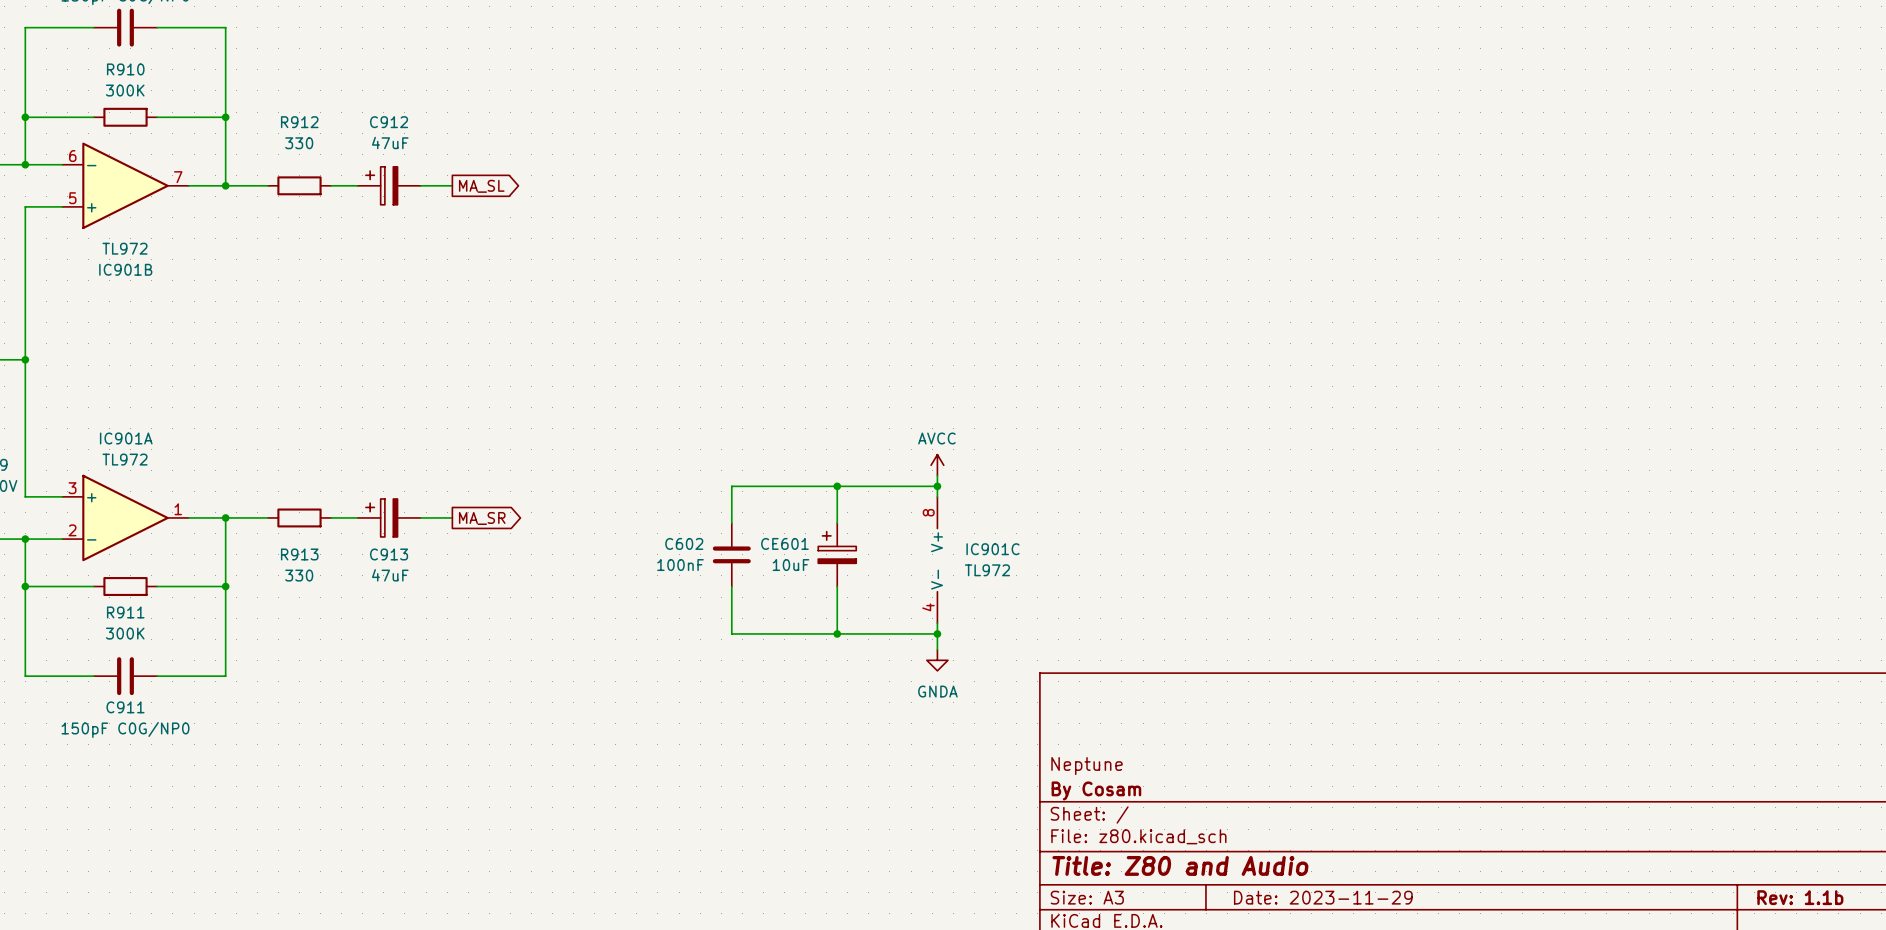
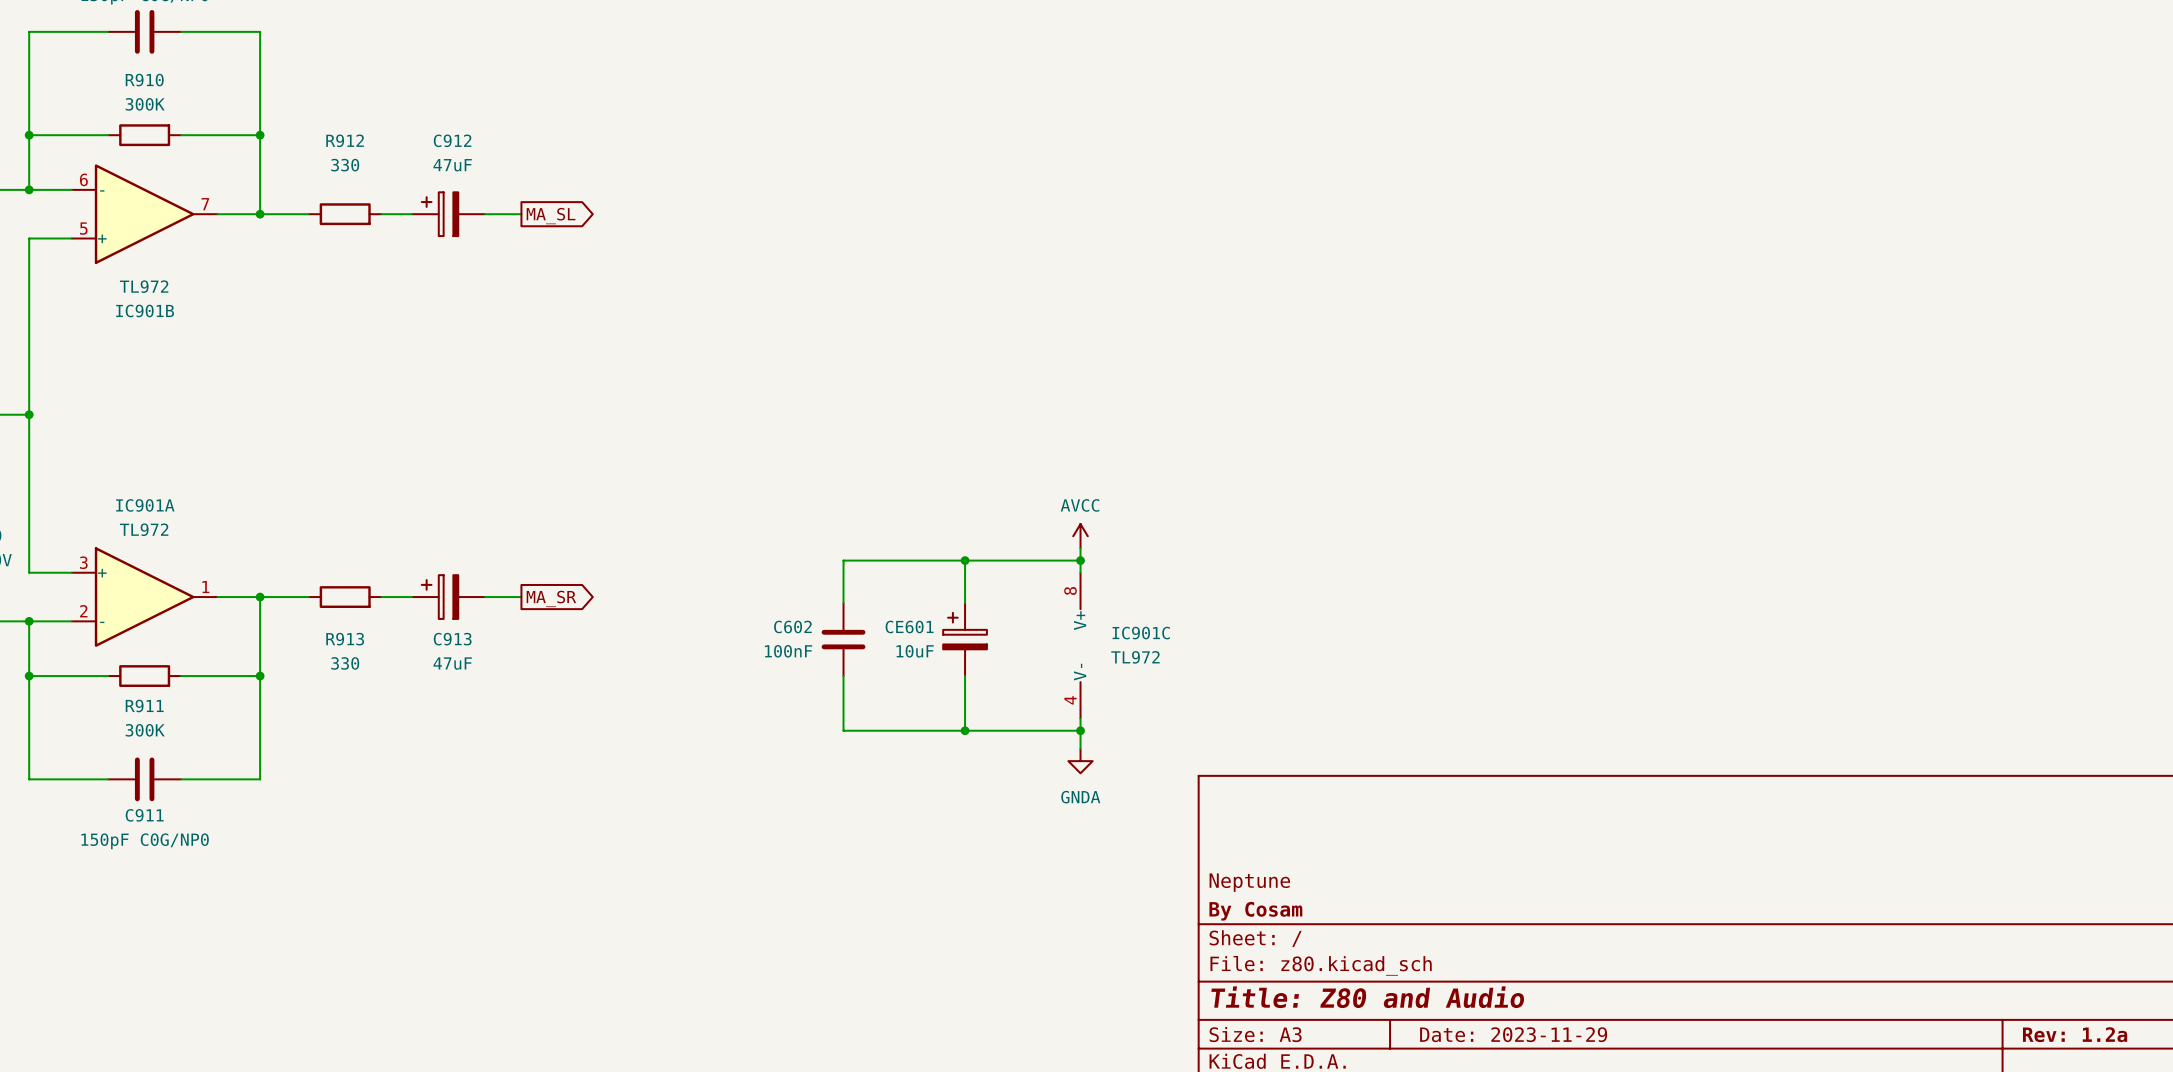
title block: Rev: 1.1b (1800, 897) -> Rev: 1.2a (2075, 1034)

